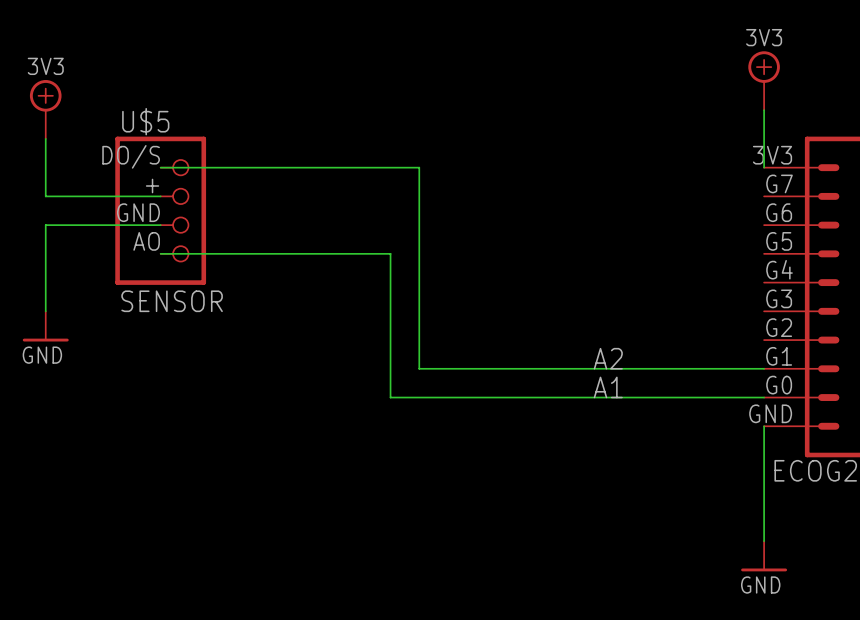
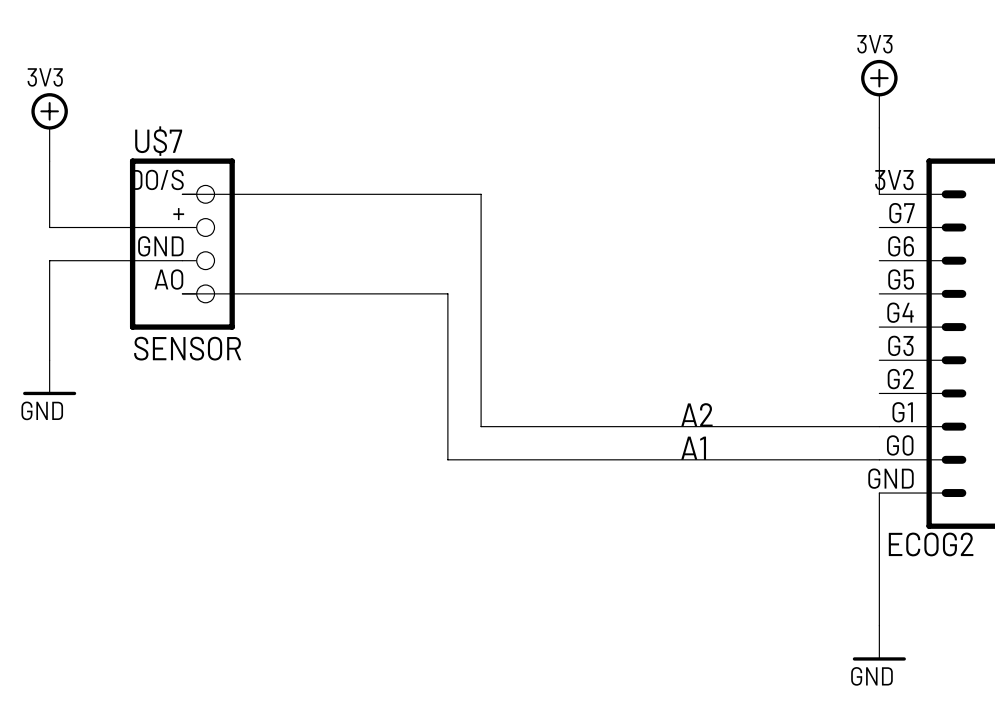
U$5 name: U$5 (145, 121) -> U$7 (158, 141)

